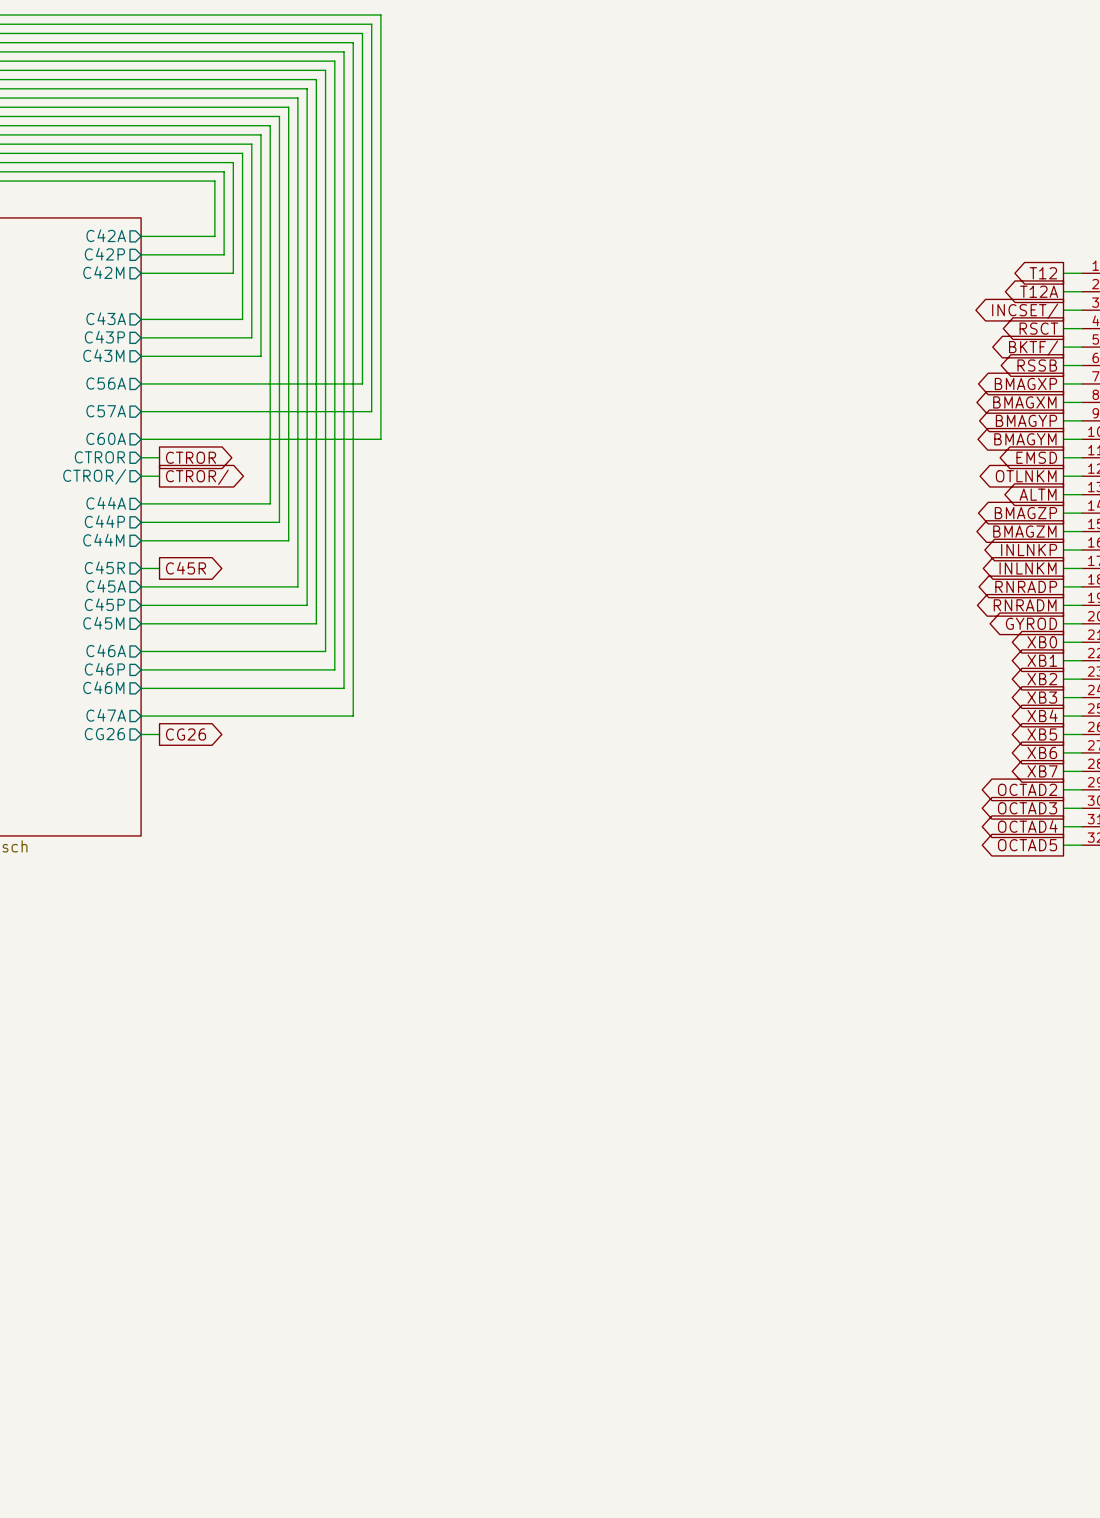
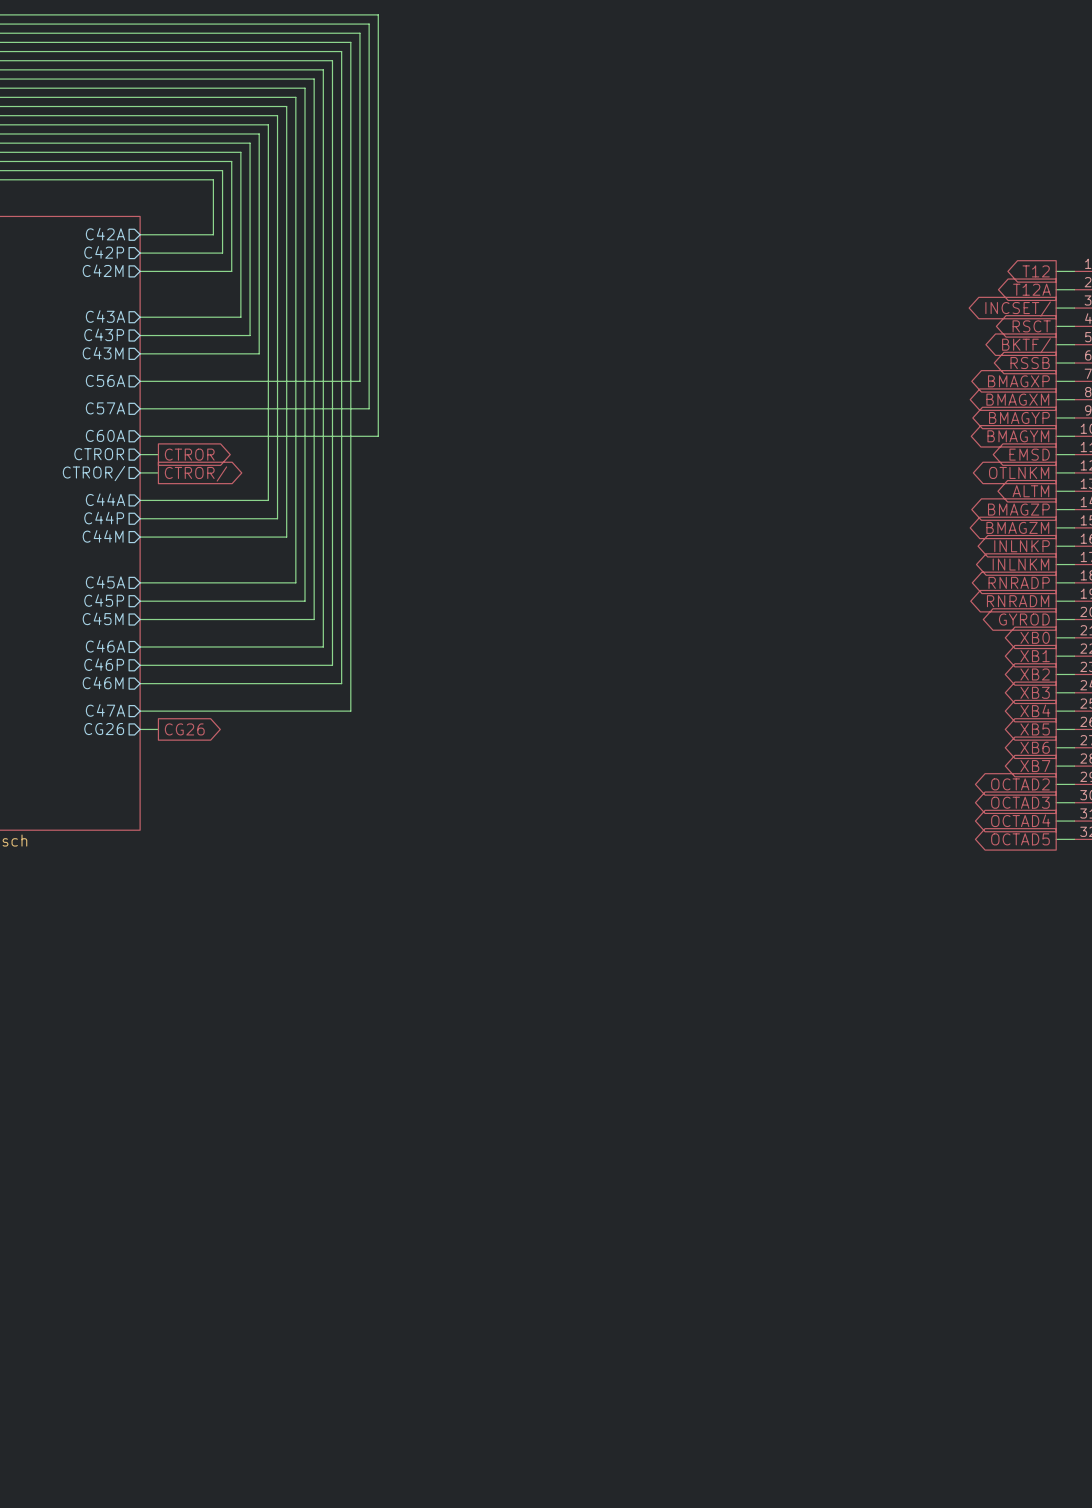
sheet pin: C45R (104, 567) -> none
wire: (141, 568) (159, 568) -> none
global label: C45R (186, 568) -> none

